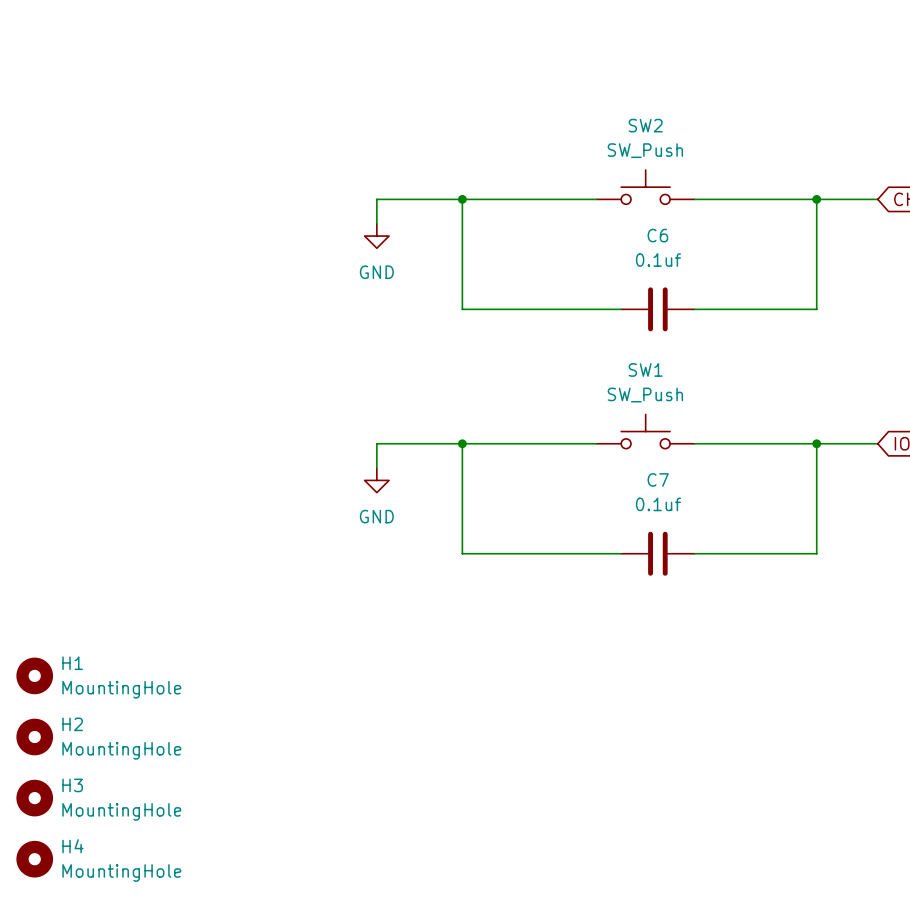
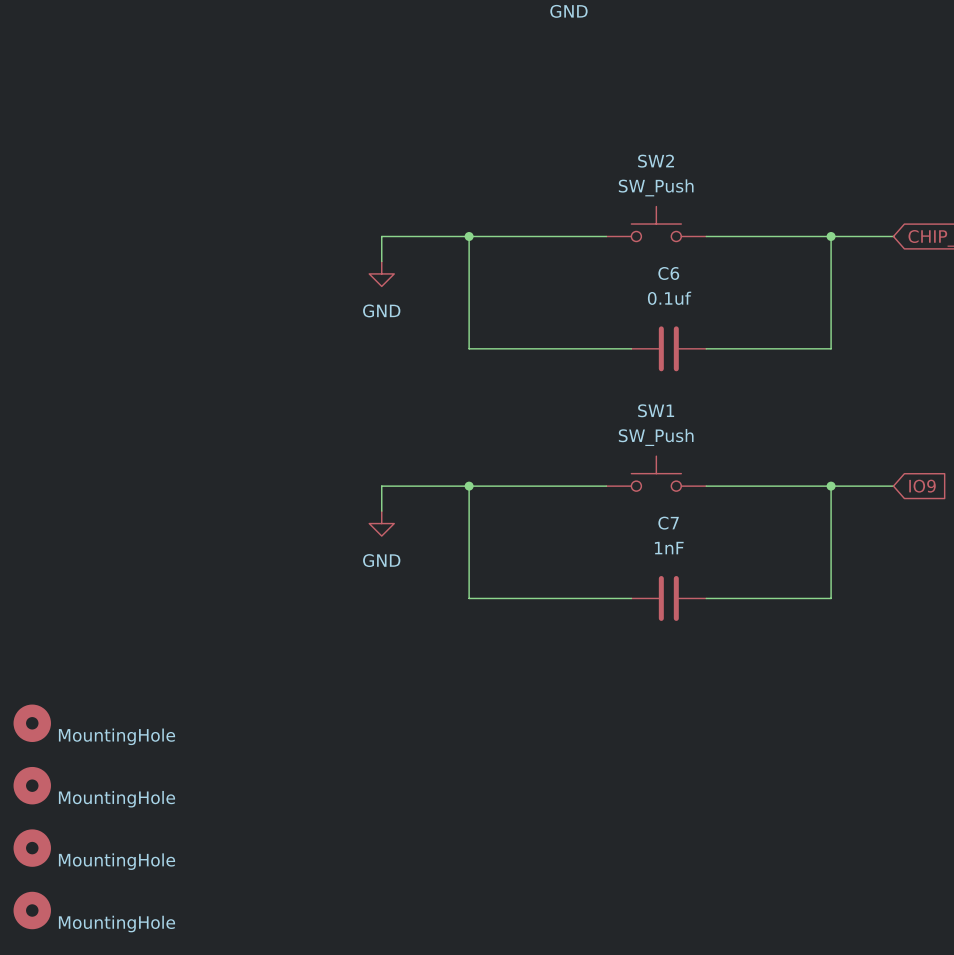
C7 value: 0.1uf (658, 504) -> 1nF (669, 548)
H1 name: H1 (72, 663) -> none
H2 name: H2 (72, 724) -> none
H3 name: H3 (72, 785) -> none
H4 name: H4 (72, 846) -> none

